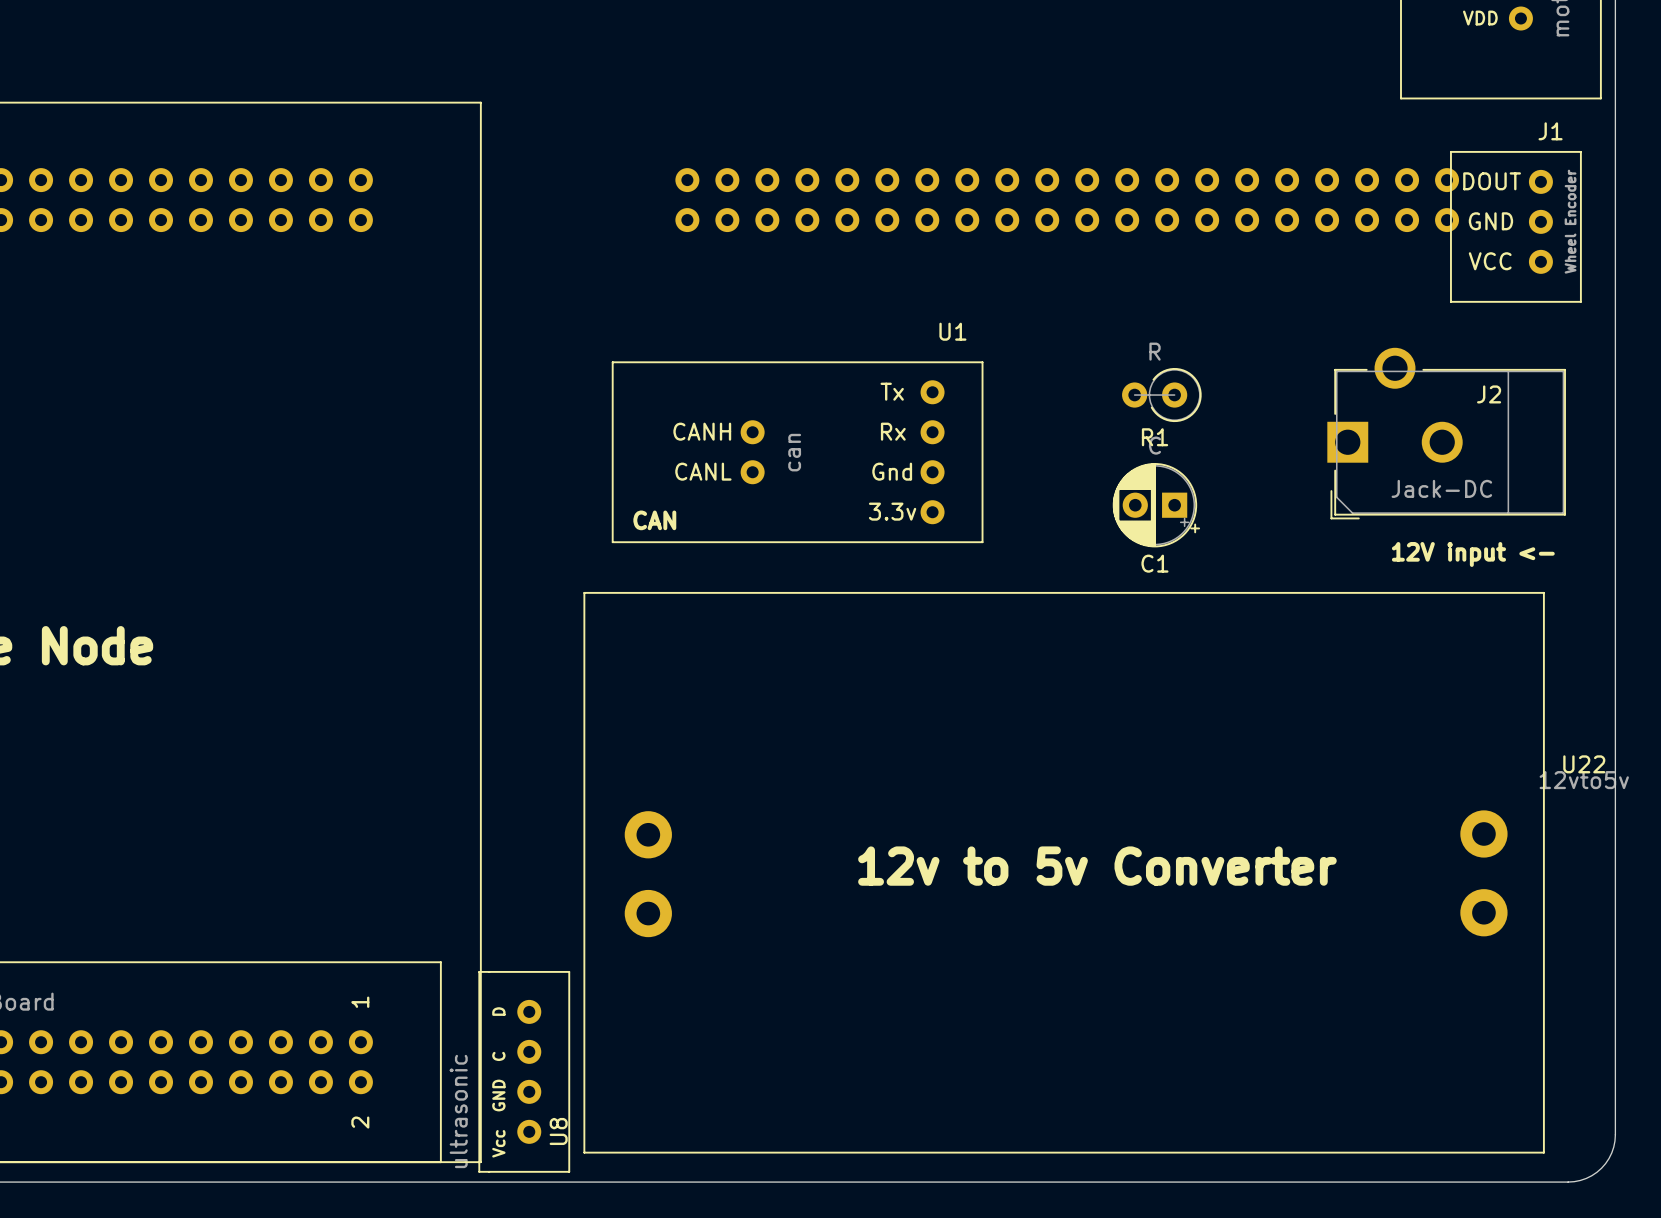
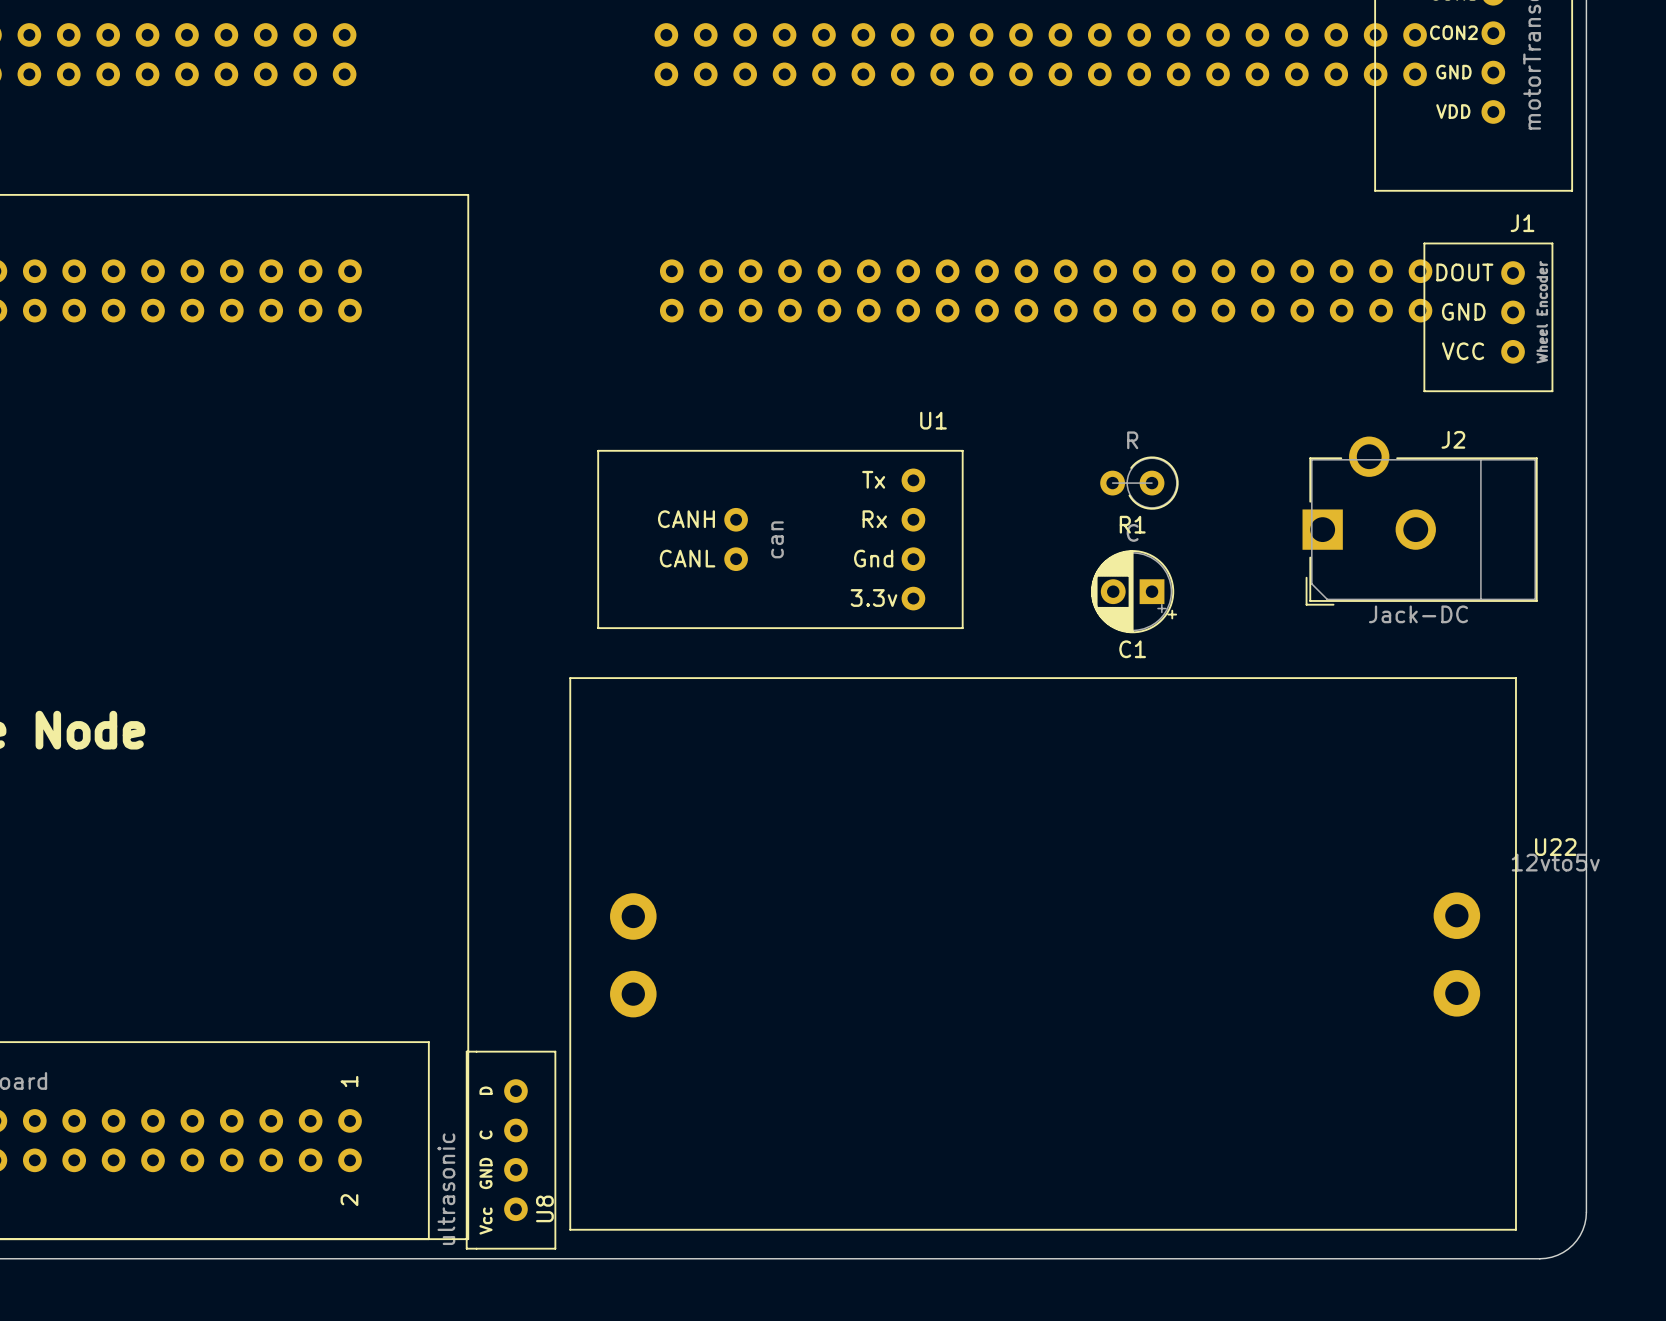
J2 name position: J2 (1489, 394) -> J2 (1453, 439)
J2 value position: Jack-DC (1441, 488) -> Jack-DC (1418, 614)
text: CAN (654, 520) -> none
text: 12V input <- (1473, 554) -> none
text: 12v to 5v Converter (1097, 866) -> none

